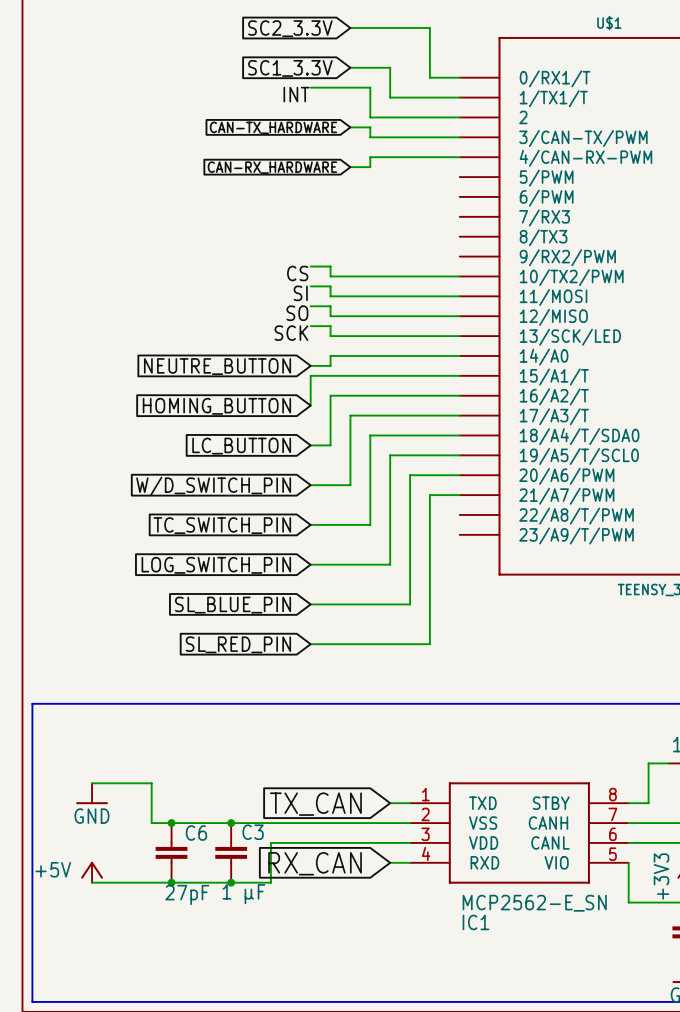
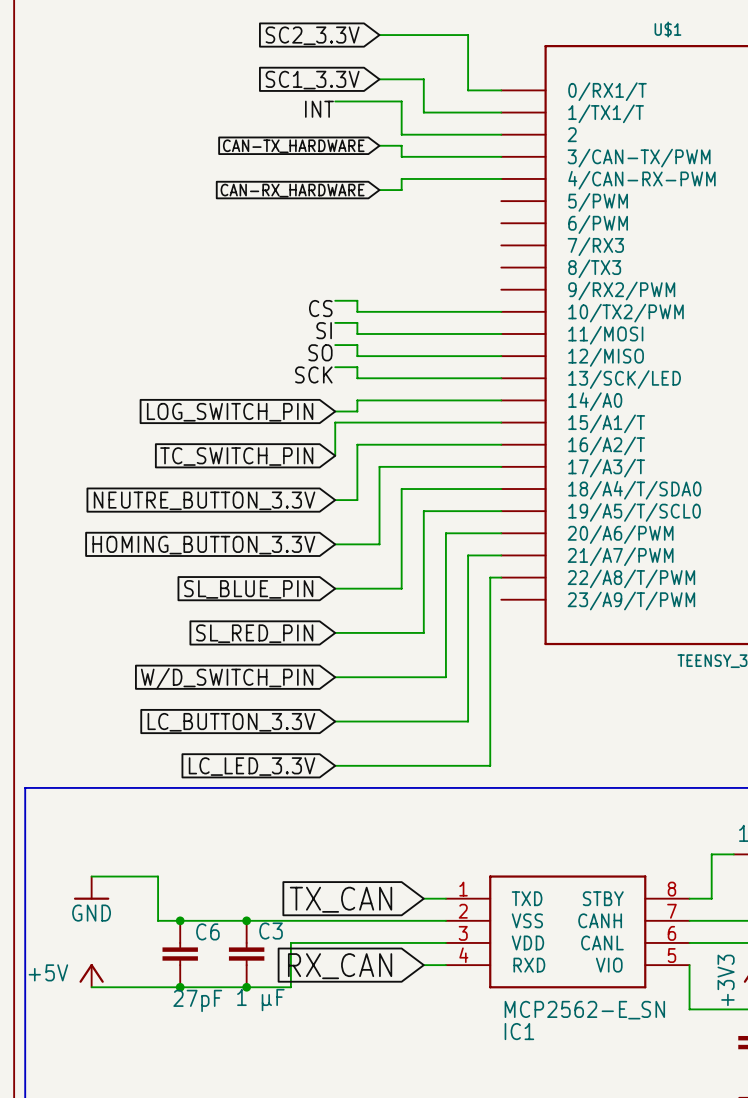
global label: NEUTRE_BUTTON (217, 366) -> LOG_SWITCH_PIN (230, 412)
global label: HOMING_BUTTON (216, 406) -> TC_SWITCH_PIN (236, 456)
global label: LC_BUTTON (241, 446) -> NEUTRE_BUTTON_3.3V (204, 500)
global label: W/D_SWITCH_PIN (213, 486) -> HOMING_BUTTON_3.3V (203, 545)
wire: none -> (501, 577) (490, 577) (490, 765) (335, 765)
global label: TC_SWITCH_PIN (222, 525) -> SL_BLUE_PIN (248, 589)
global label: LOG_SWITCH_PIN (216, 565) -> SL_RED_PIN (254, 633)
global label: SL_BLUE_PIN (233, 605) -> W/D_SWITCH_PIN (227, 678)
global label: SL_RED_PIN (238, 644) -> LC_BUTTON_3.3V (231, 722)
global label: none -> LC_LED_3.3V (252, 766)

